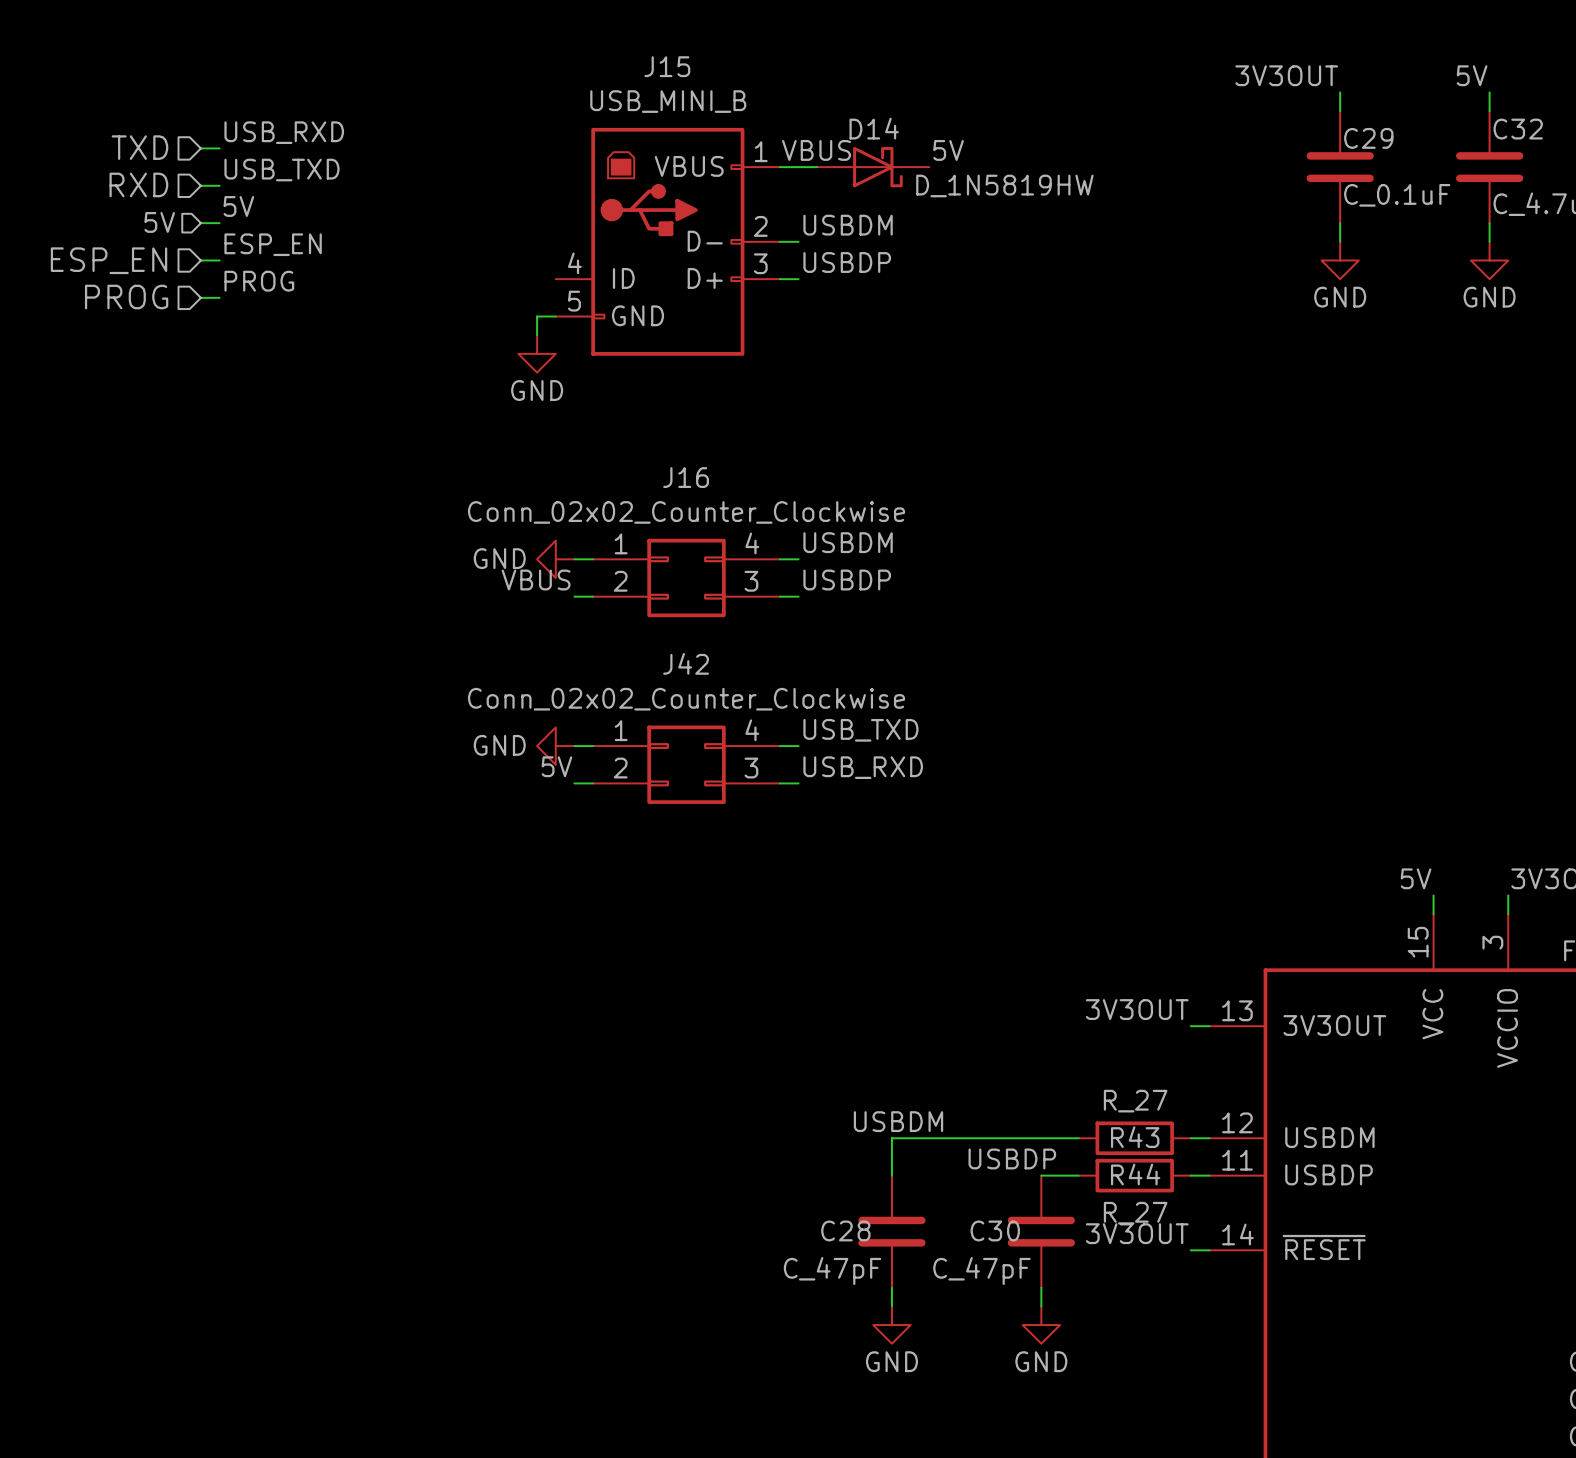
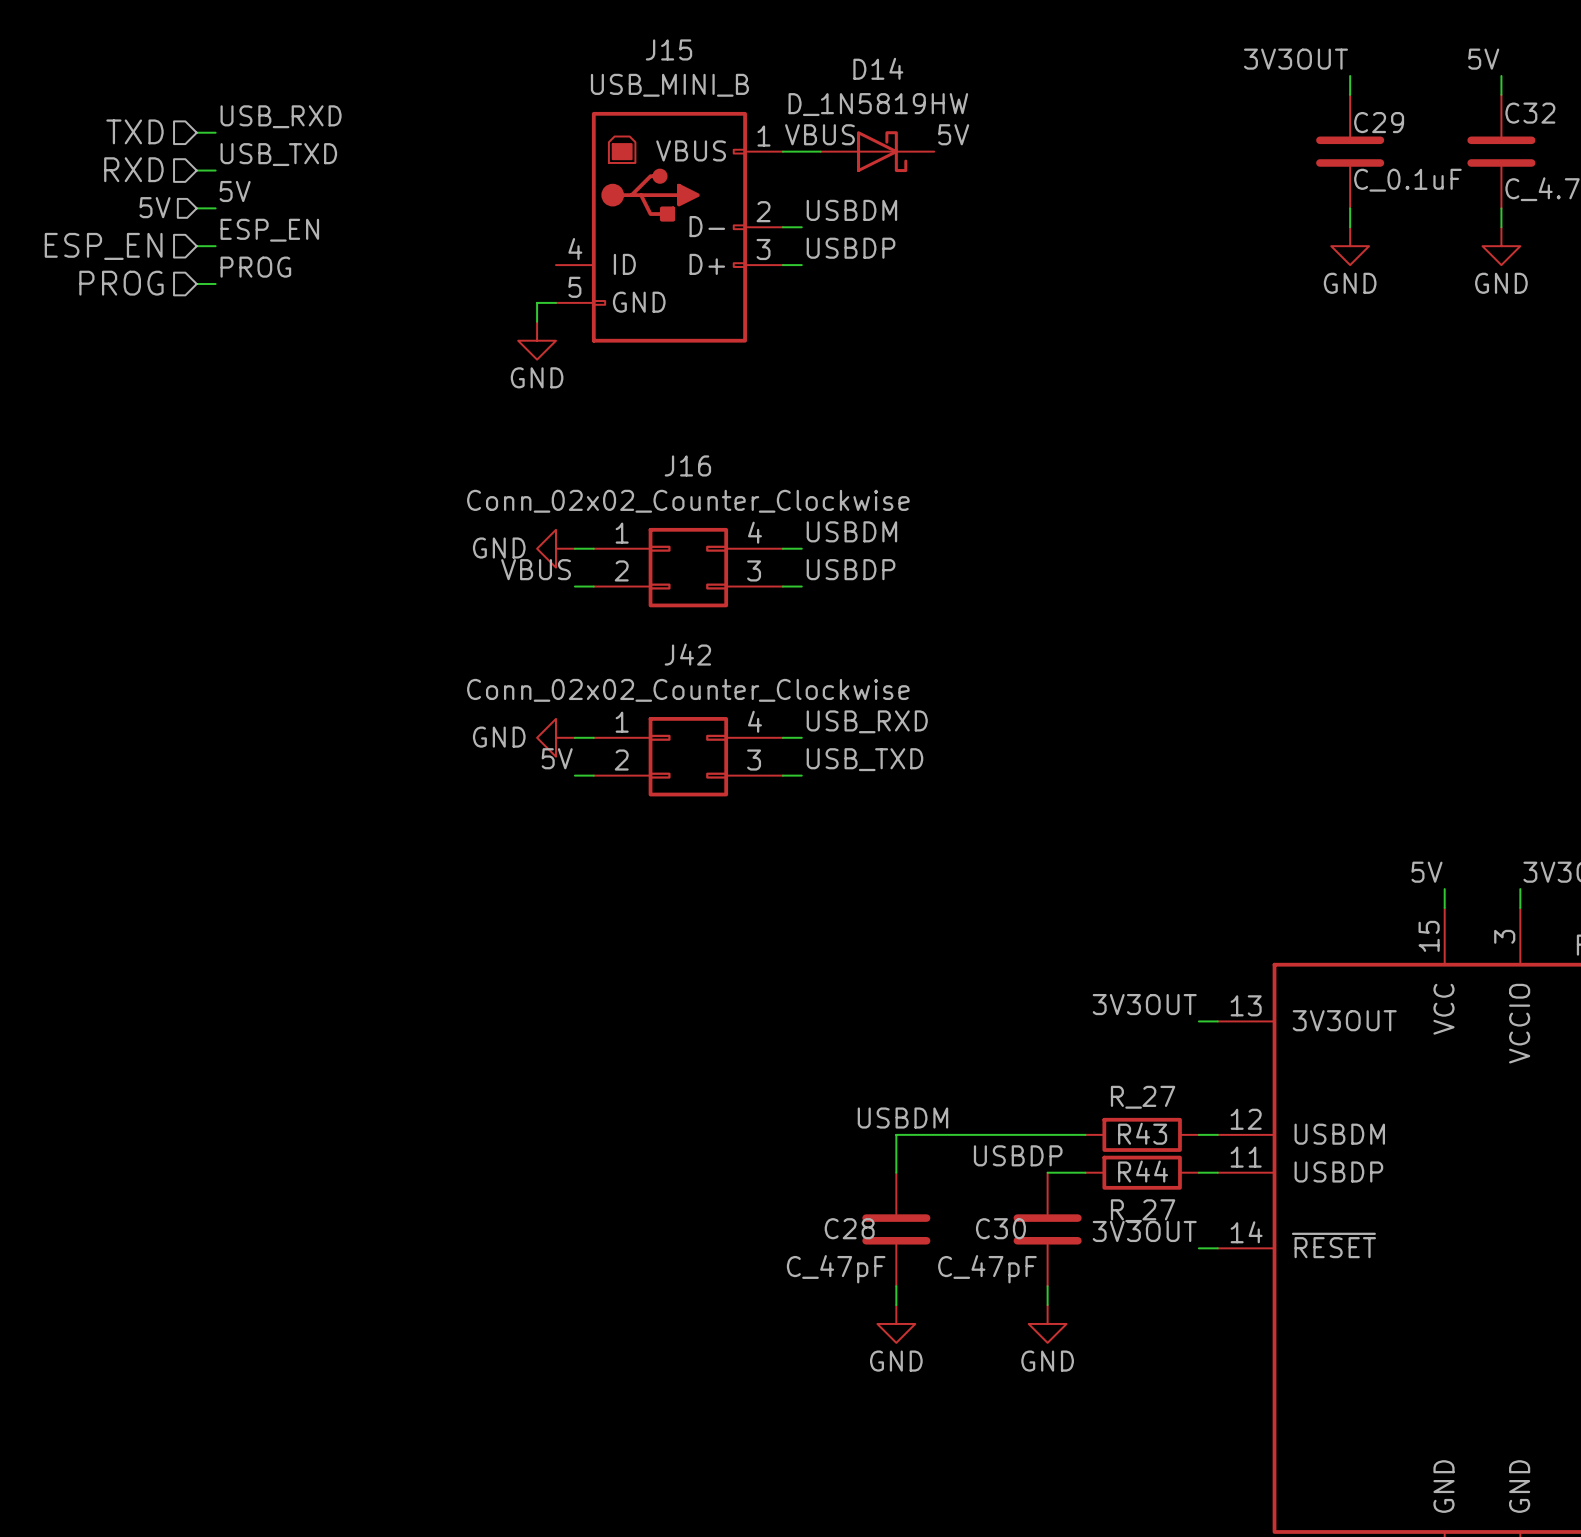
D14 name position: D14 (874, 128) -> D14 (878, 68)
D14 value position: D_1N5819HW (1004, 185) -> D_1N5819HW (878, 104)
label: USB_TXD (860, 730) -> USB_RXD (867, 721)
label: USB_RXD (863, 767) -> USB_TXD (864, 759)

